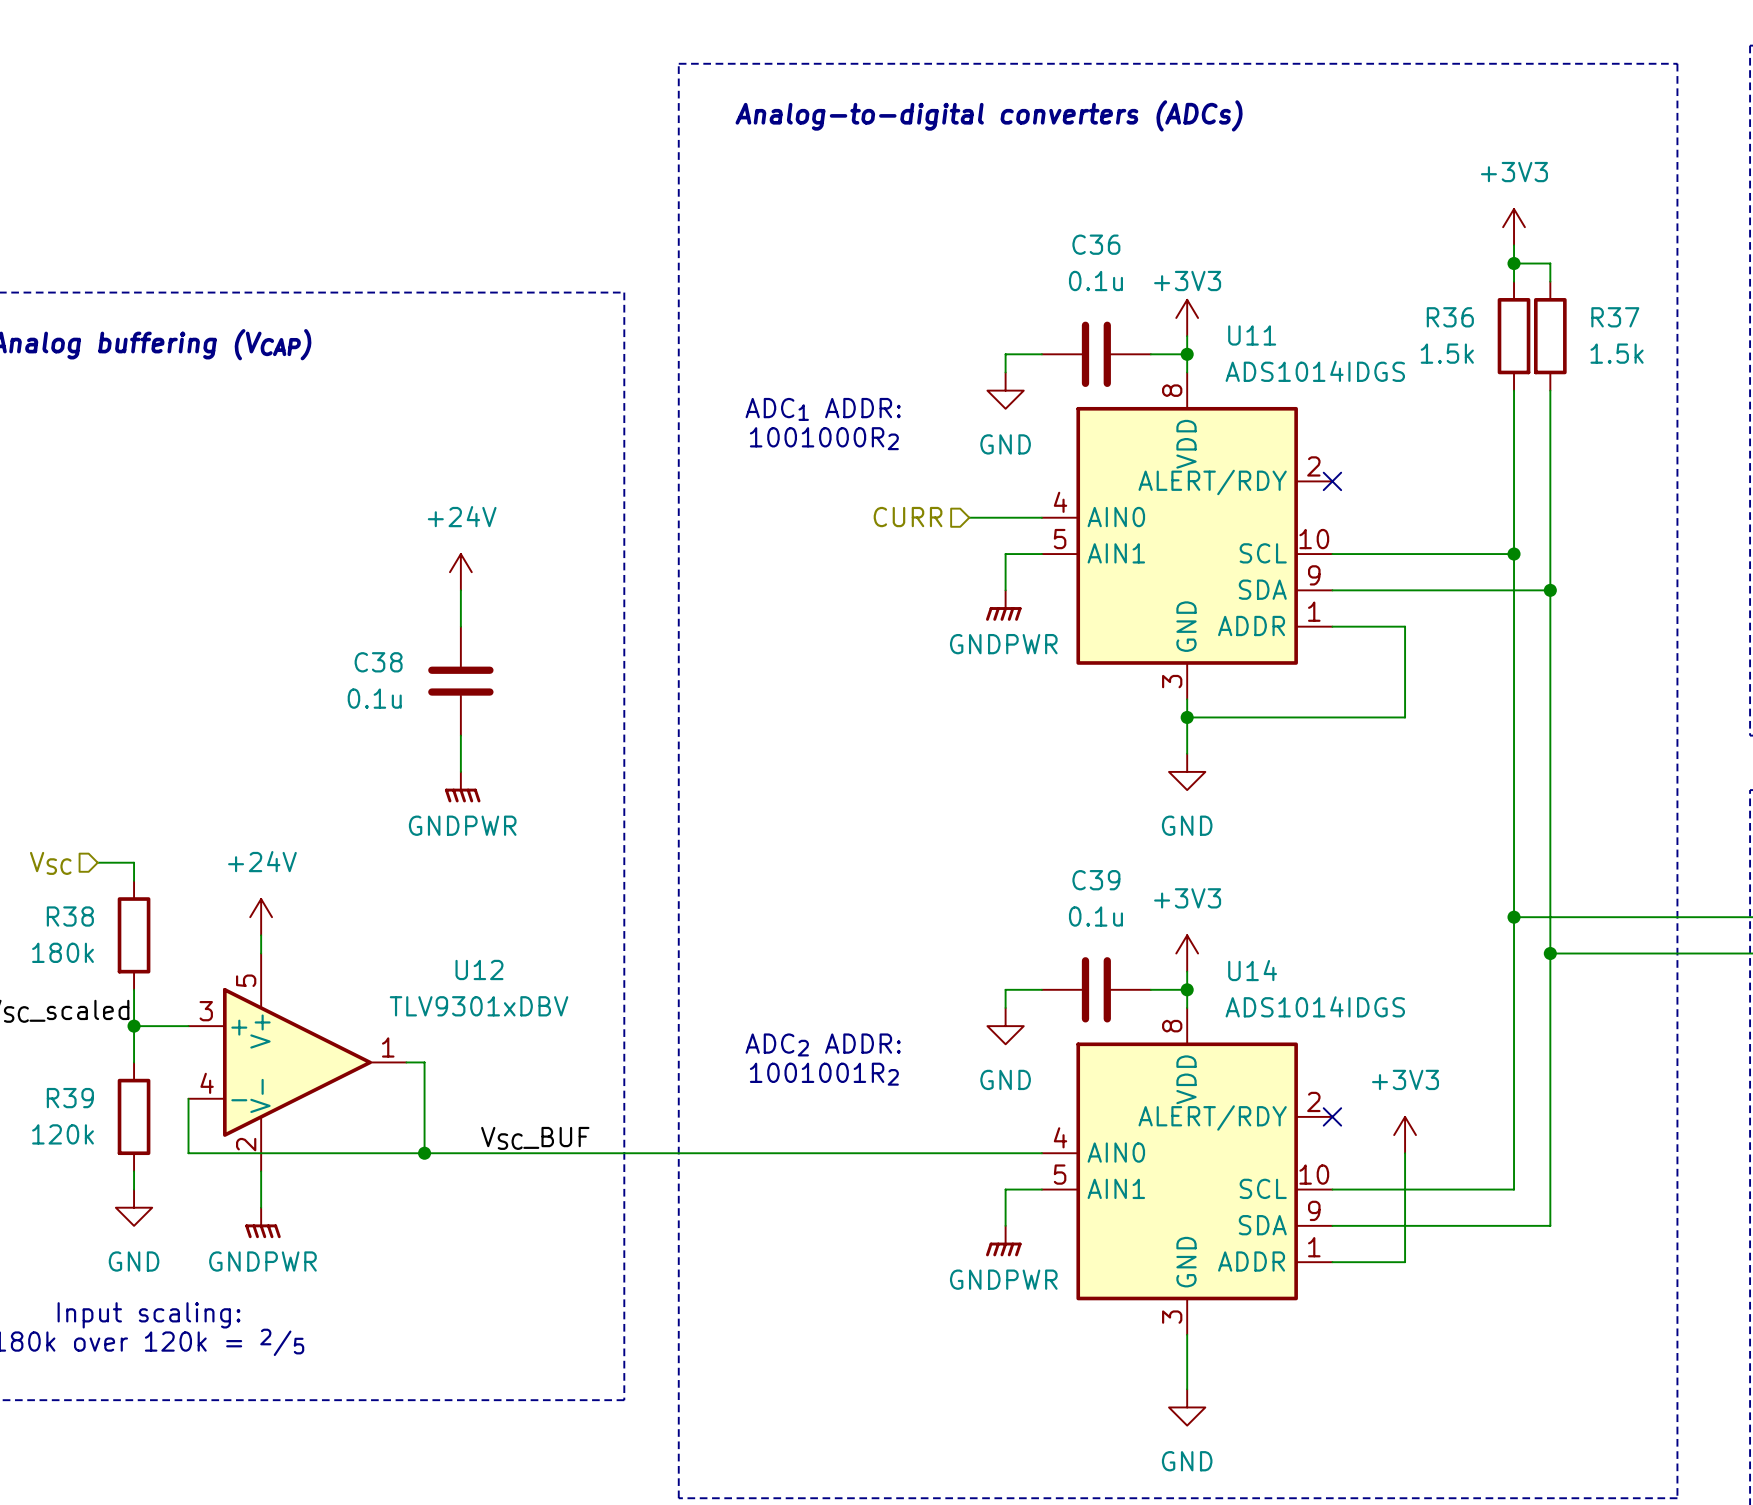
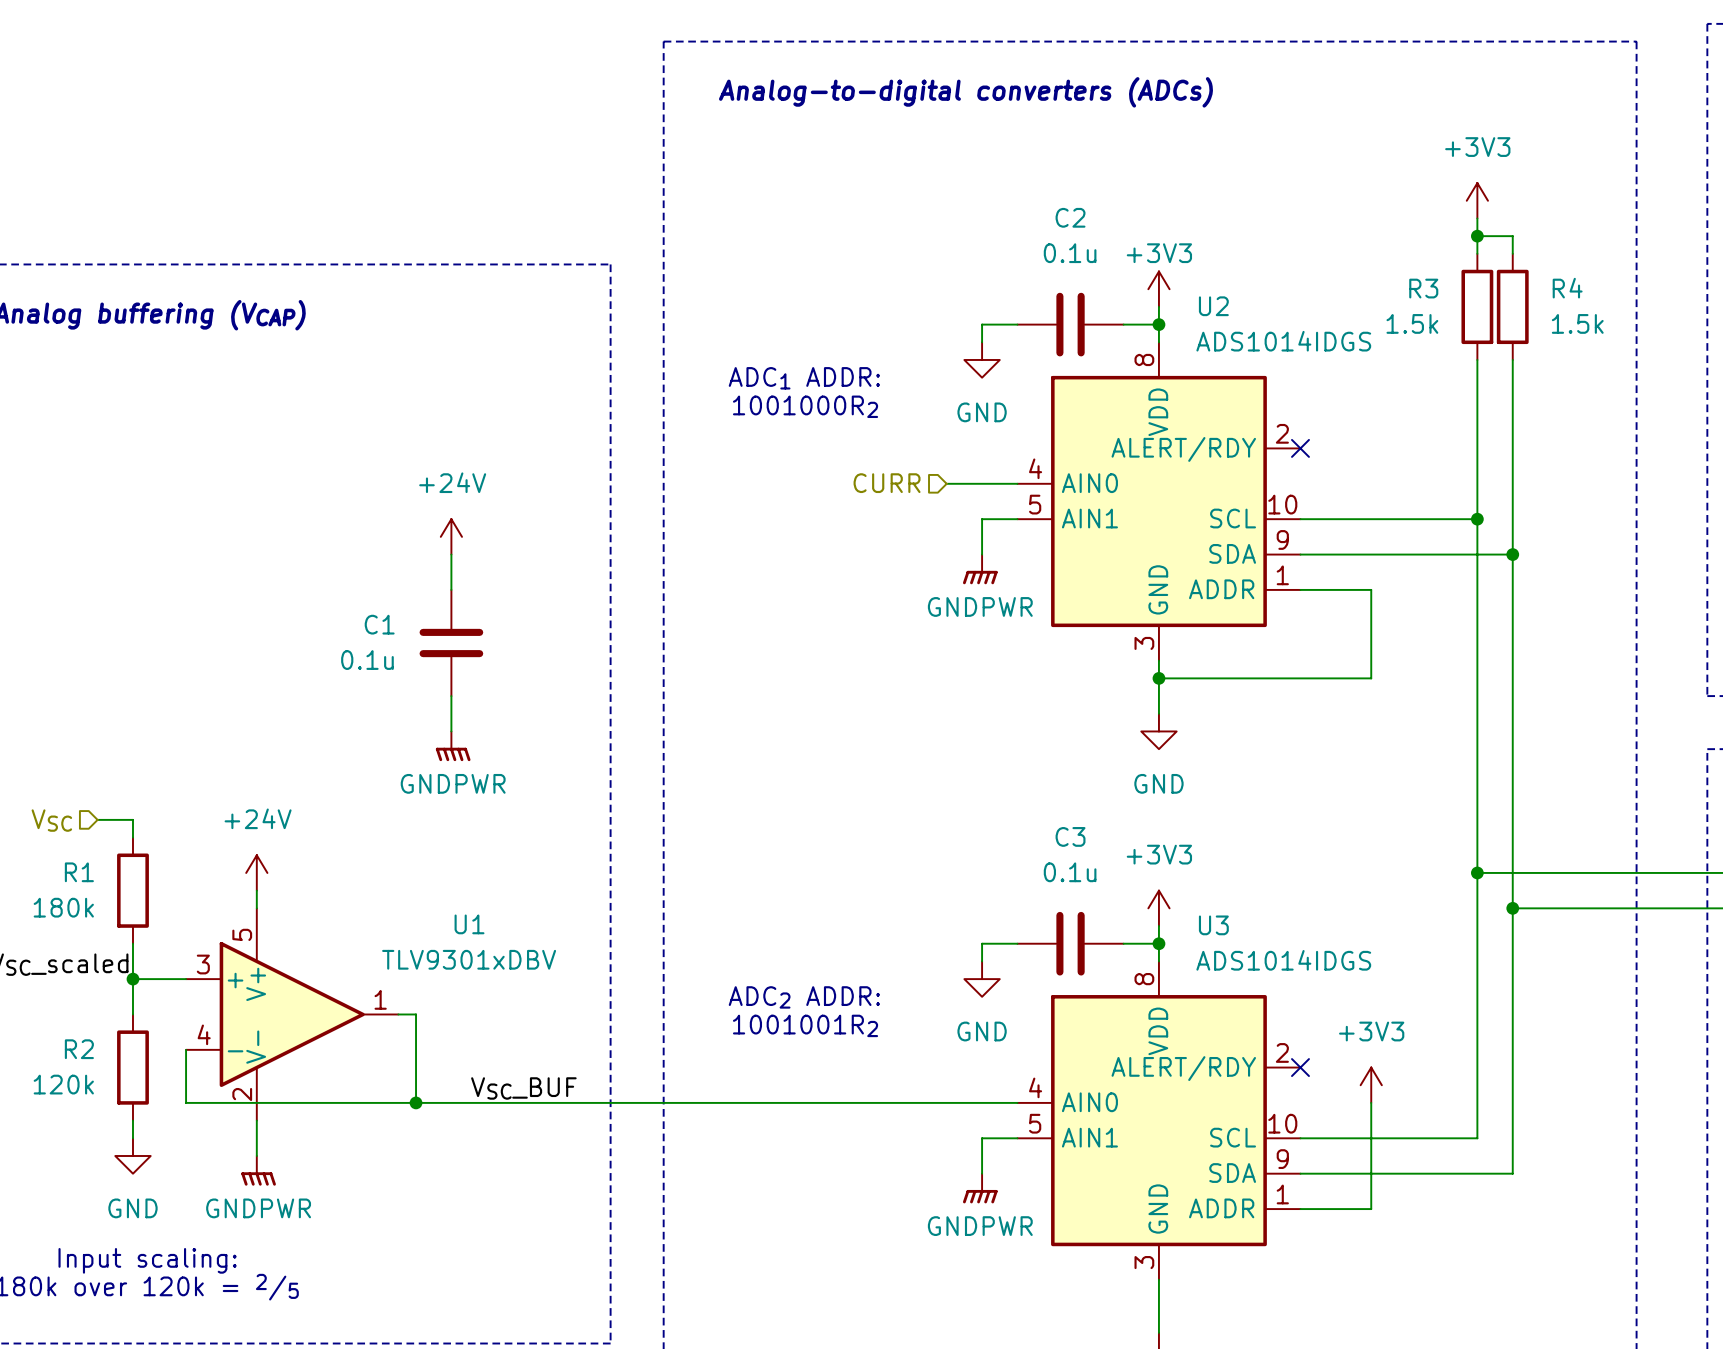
C36 name: C36 (1096, 244) -> C2 (1070, 217)
R36 name: R36 (1450, 317) -> R3 (1423, 288)
R37 name: R37 (1615, 317) -> R4 (1567, 288)
U11 name: U11 (1252, 335) -> U2 (1213, 306)
C38 name: C38 (378, 662) -> C1 (379, 624)
C39 name: C39 (1096, 880) -> C3 (1070, 836)
R38 name: R38 (70, 916) -> R1 (79, 872)
U12 name: U12 (479, 969) -> U1 (469, 924)
U14 name: U14 (1252, 970) -> U3 (1213, 925)
R39 name: R39 (70, 1098) -> R2 (79, 1049)

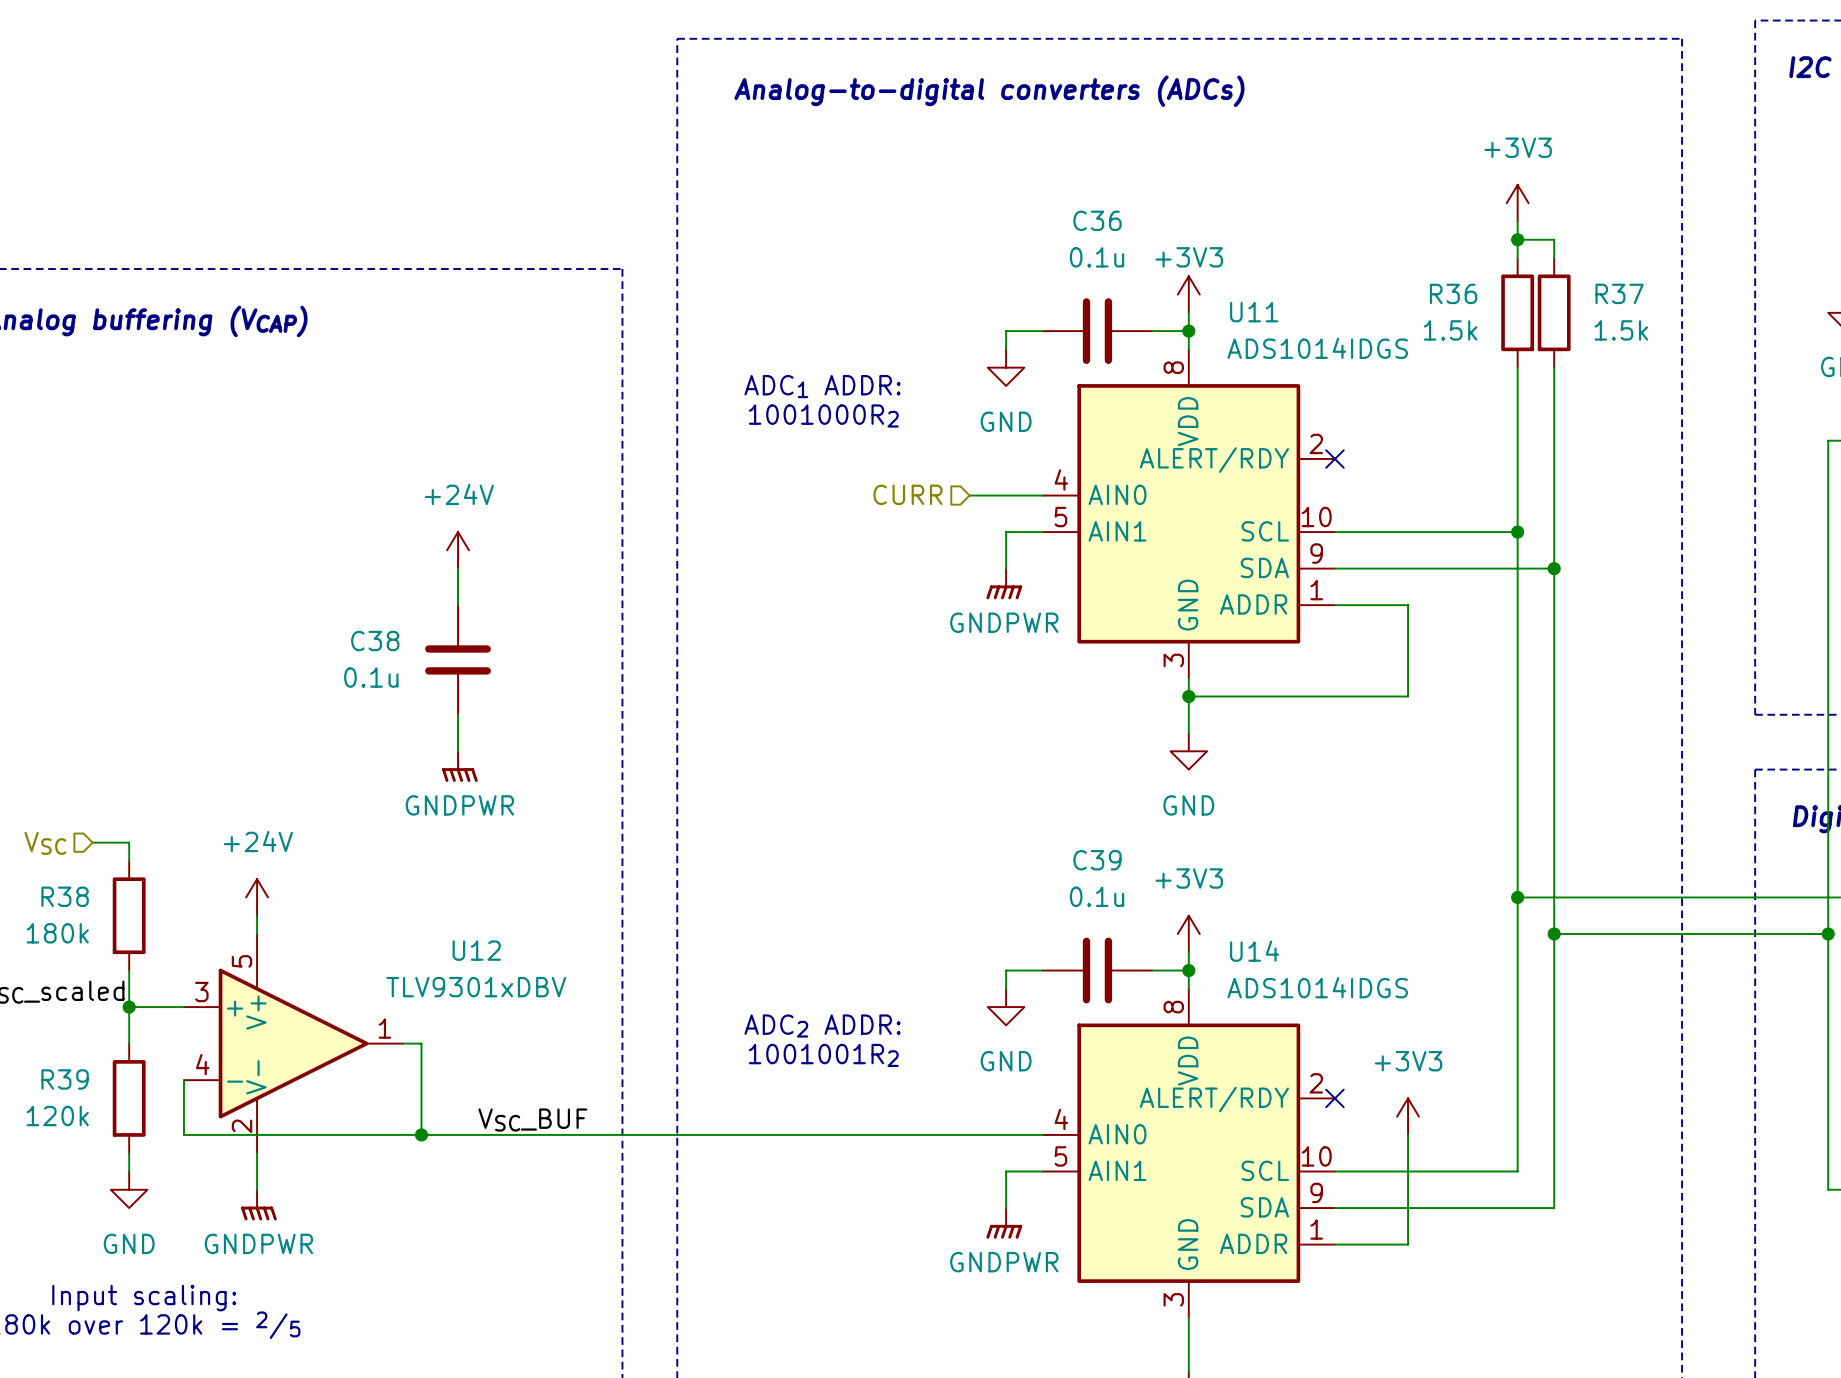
C2 name: C2 (1070, 217) -> C36 (1097, 220)
R3 name: R3 (1423, 288) -> R36 (1453, 293)
R4 name: R4 (1567, 288) -> R37 (1619, 293)
U2 name: U2 (1213, 306) -> U11 (1254, 312)
C1 name: C1 (379, 624) -> C38 (375, 641)
C3 name: C3 (1070, 836) -> C39 (1097, 860)
R1 name: R1 (79, 872) -> R38 (65, 896)
U1 name: U1 (469, 924) -> U12 (476, 950)
U3 name: U3 (1213, 925) -> U14 (1254, 951)
R2 name: R2 (79, 1049) -> R39 (65, 1079)

